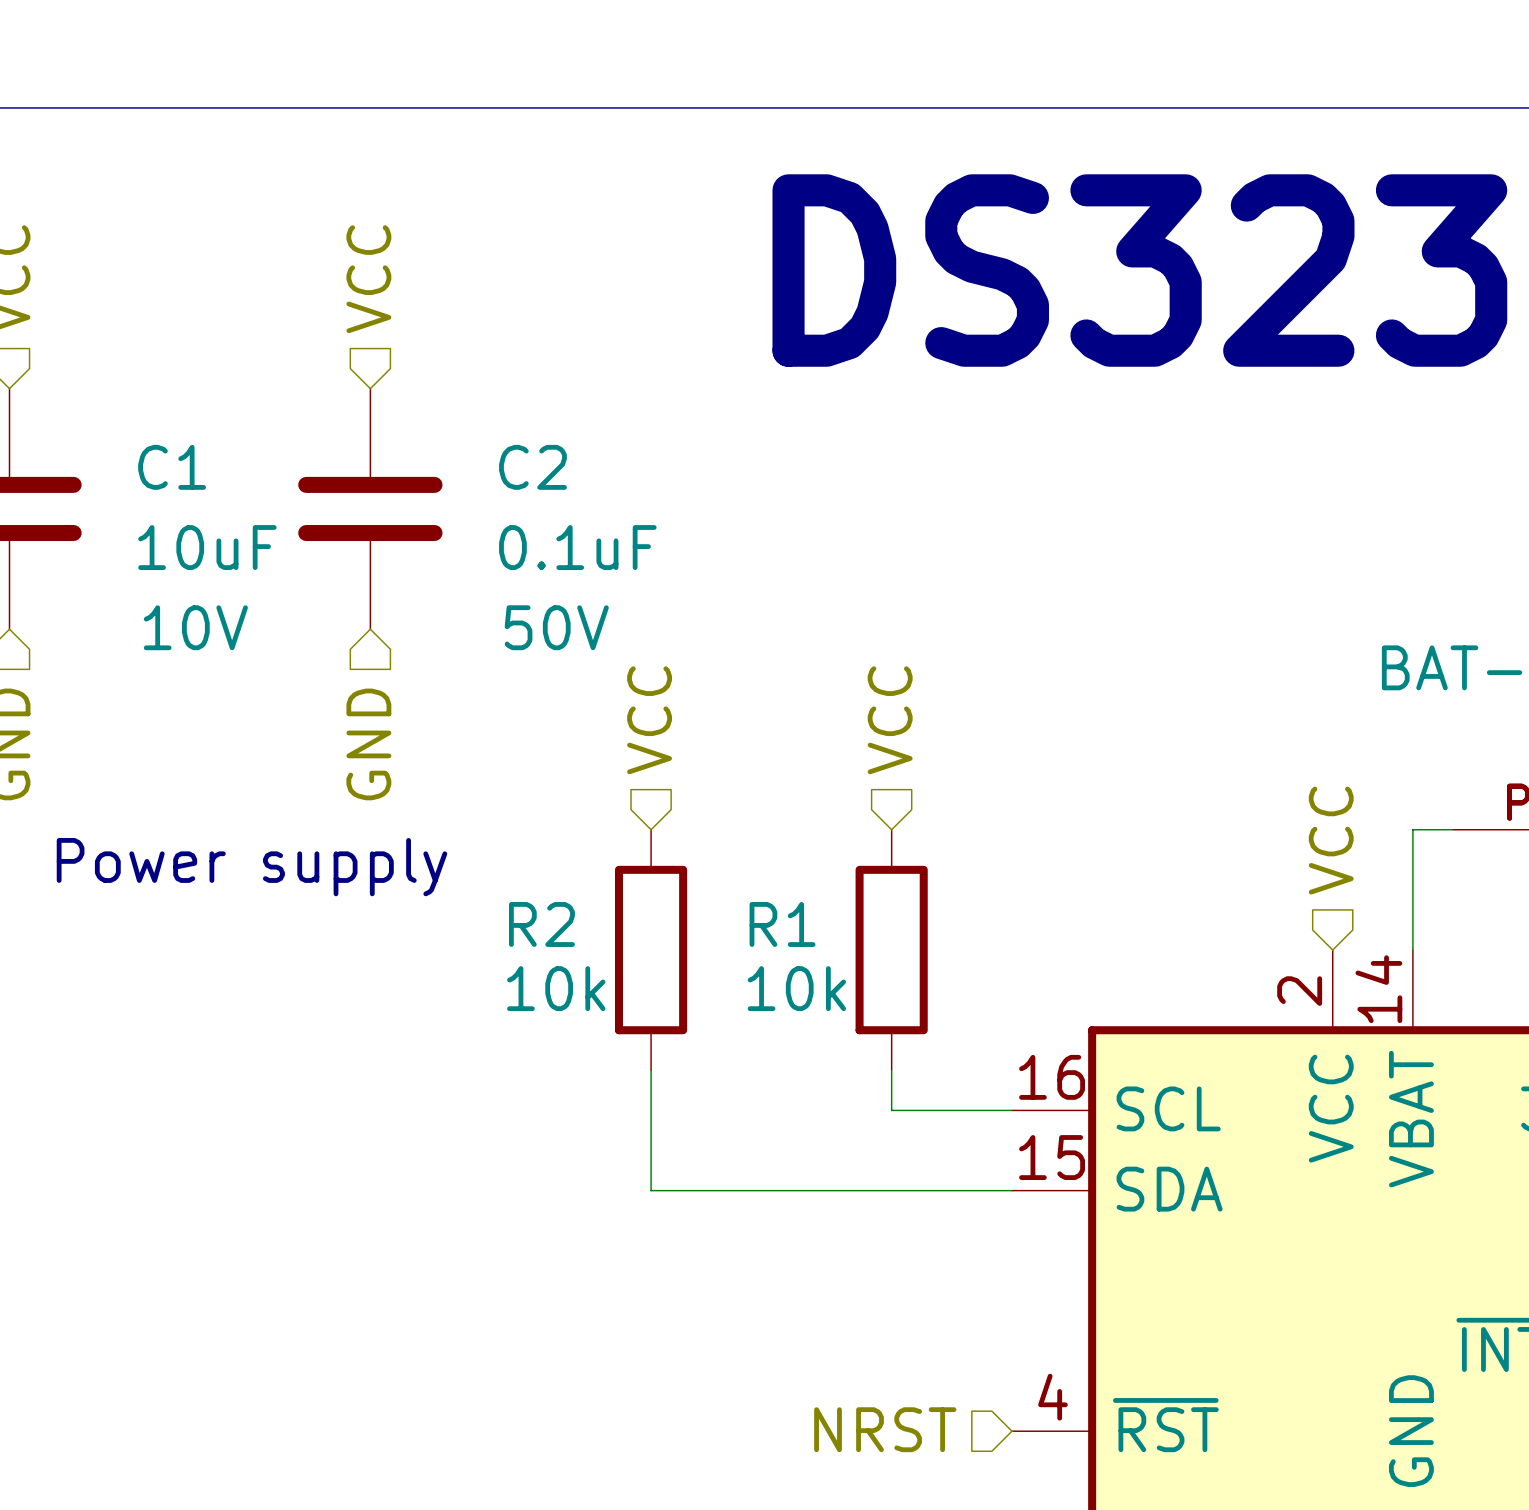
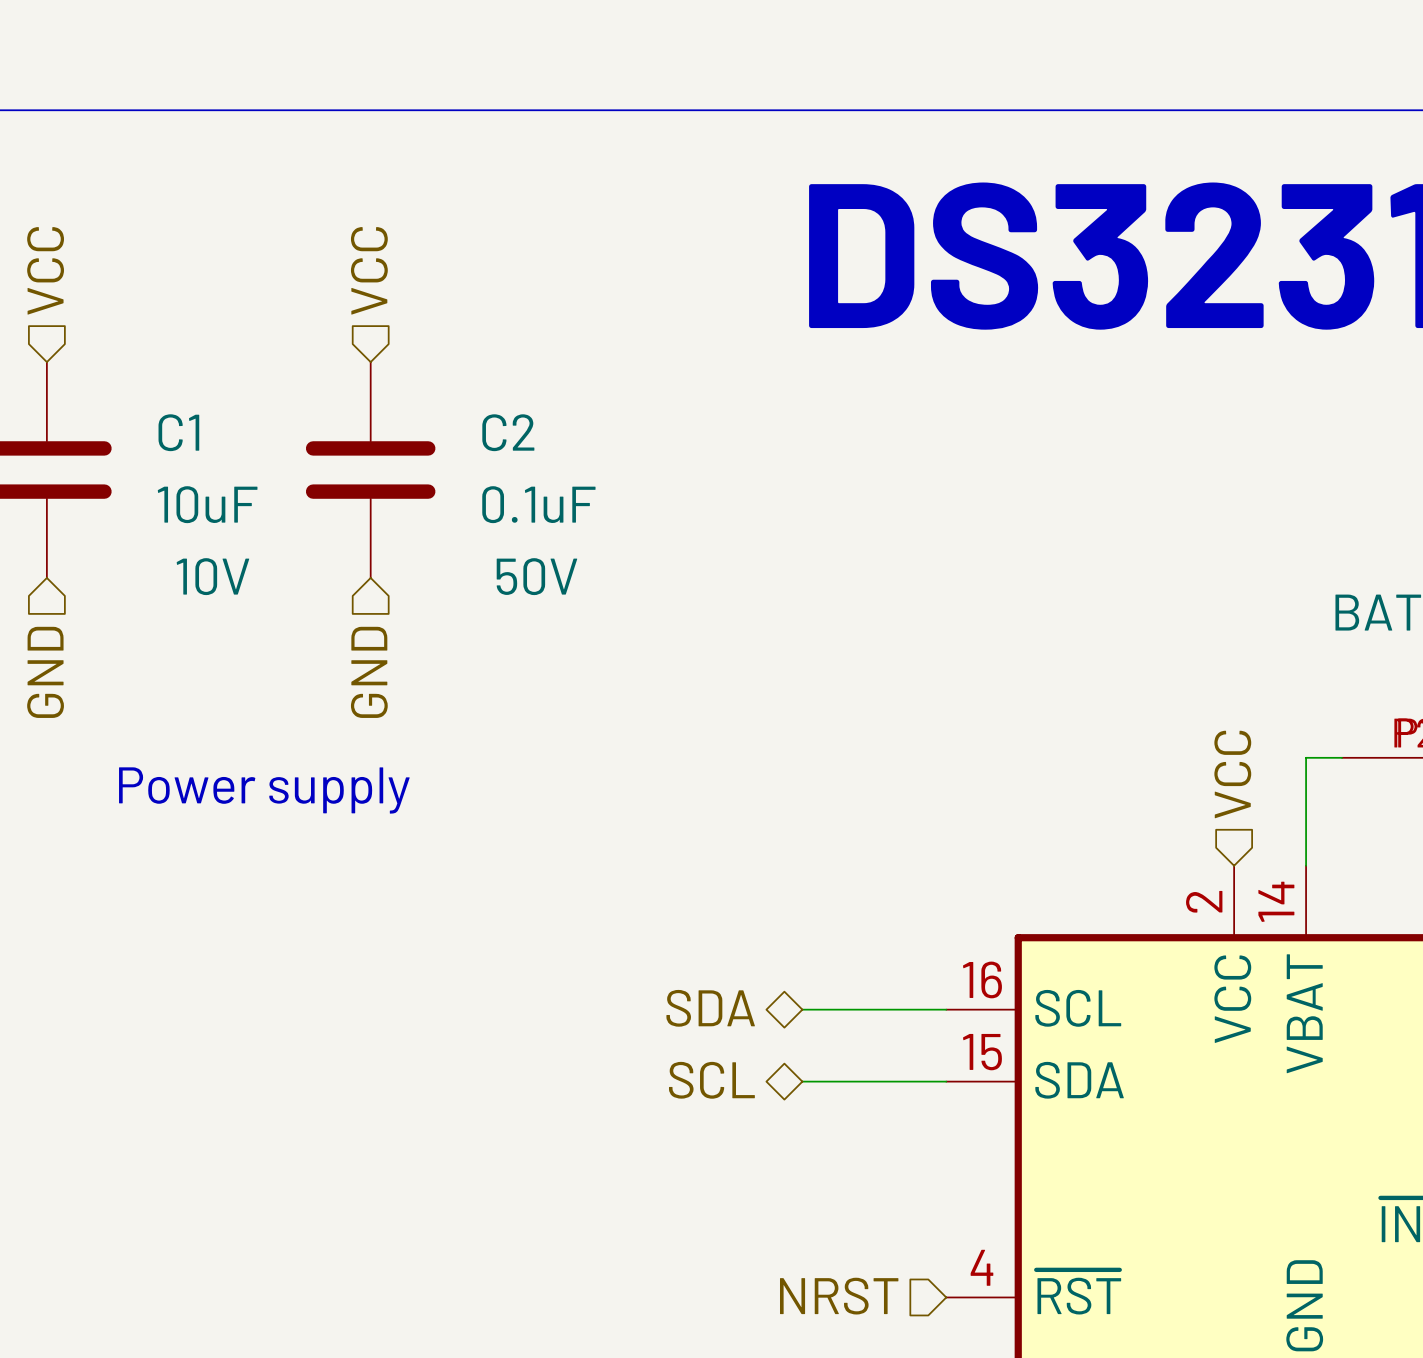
hierarchical label: VCC (649, 720) -> none
hierarchical label: VCC (890, 720) -> none
R2: 10k (651, 950) -> none
R1: 10k (891, 950) -> none
wire: (651, 1070) (651, 1190) (851, 1190) -> none
wire: (891, 1070) (891, 1110) -> (802, 1009) (838, 1009)
hierarchical label: none -> SDA (710, 1008)
hierarchical label: none -> SCL (711, 1080)

